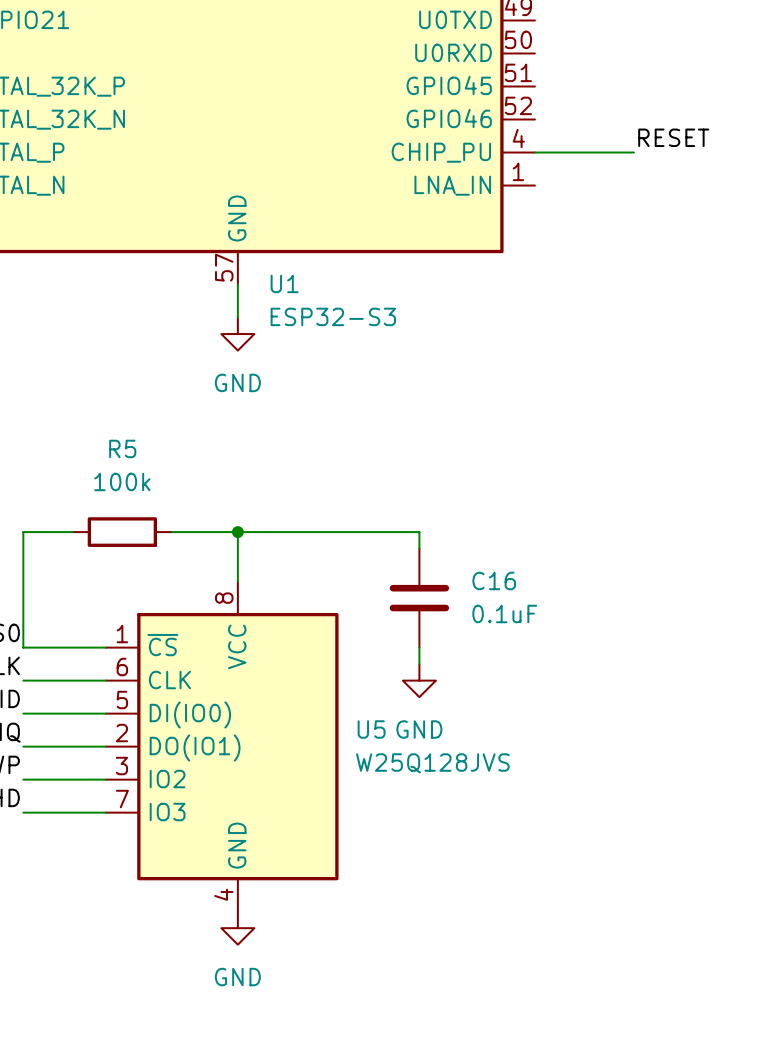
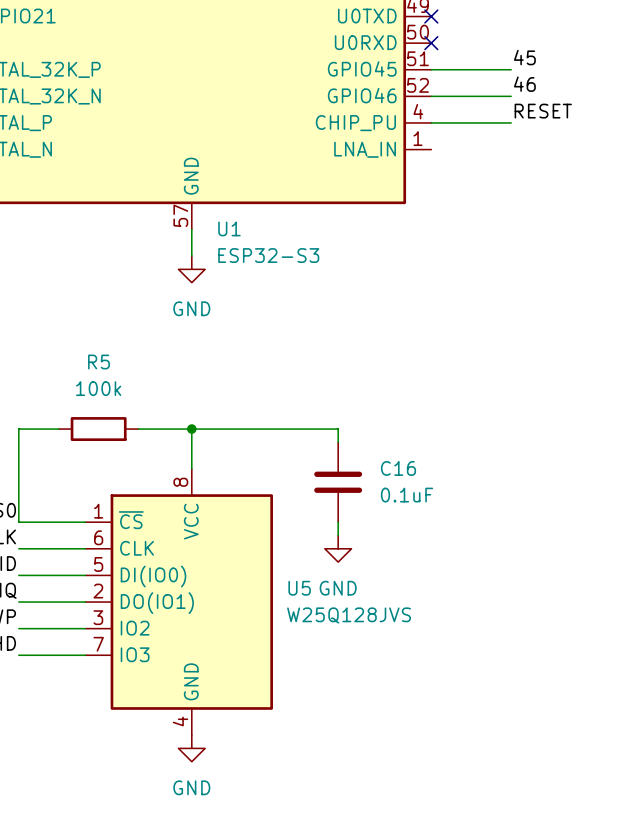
no-connect mark: none -> (431, 16)
no-connect mark: none -> (431, 43)
label: none -> 45 (524, 57)
wire: none -> (431, 69) (511, 69)
label: none -> 46 (524, 84)
wire: none -> (431, 96) (511, 96)

